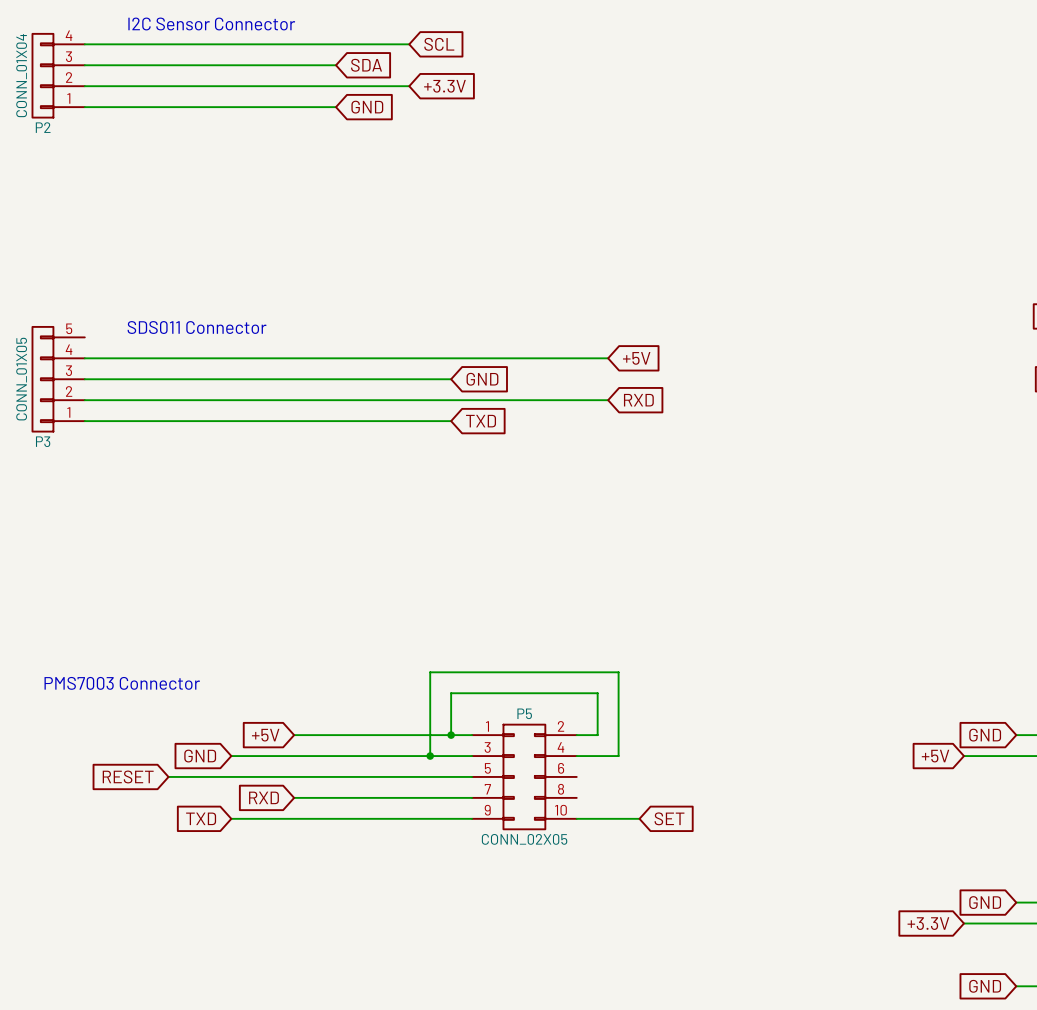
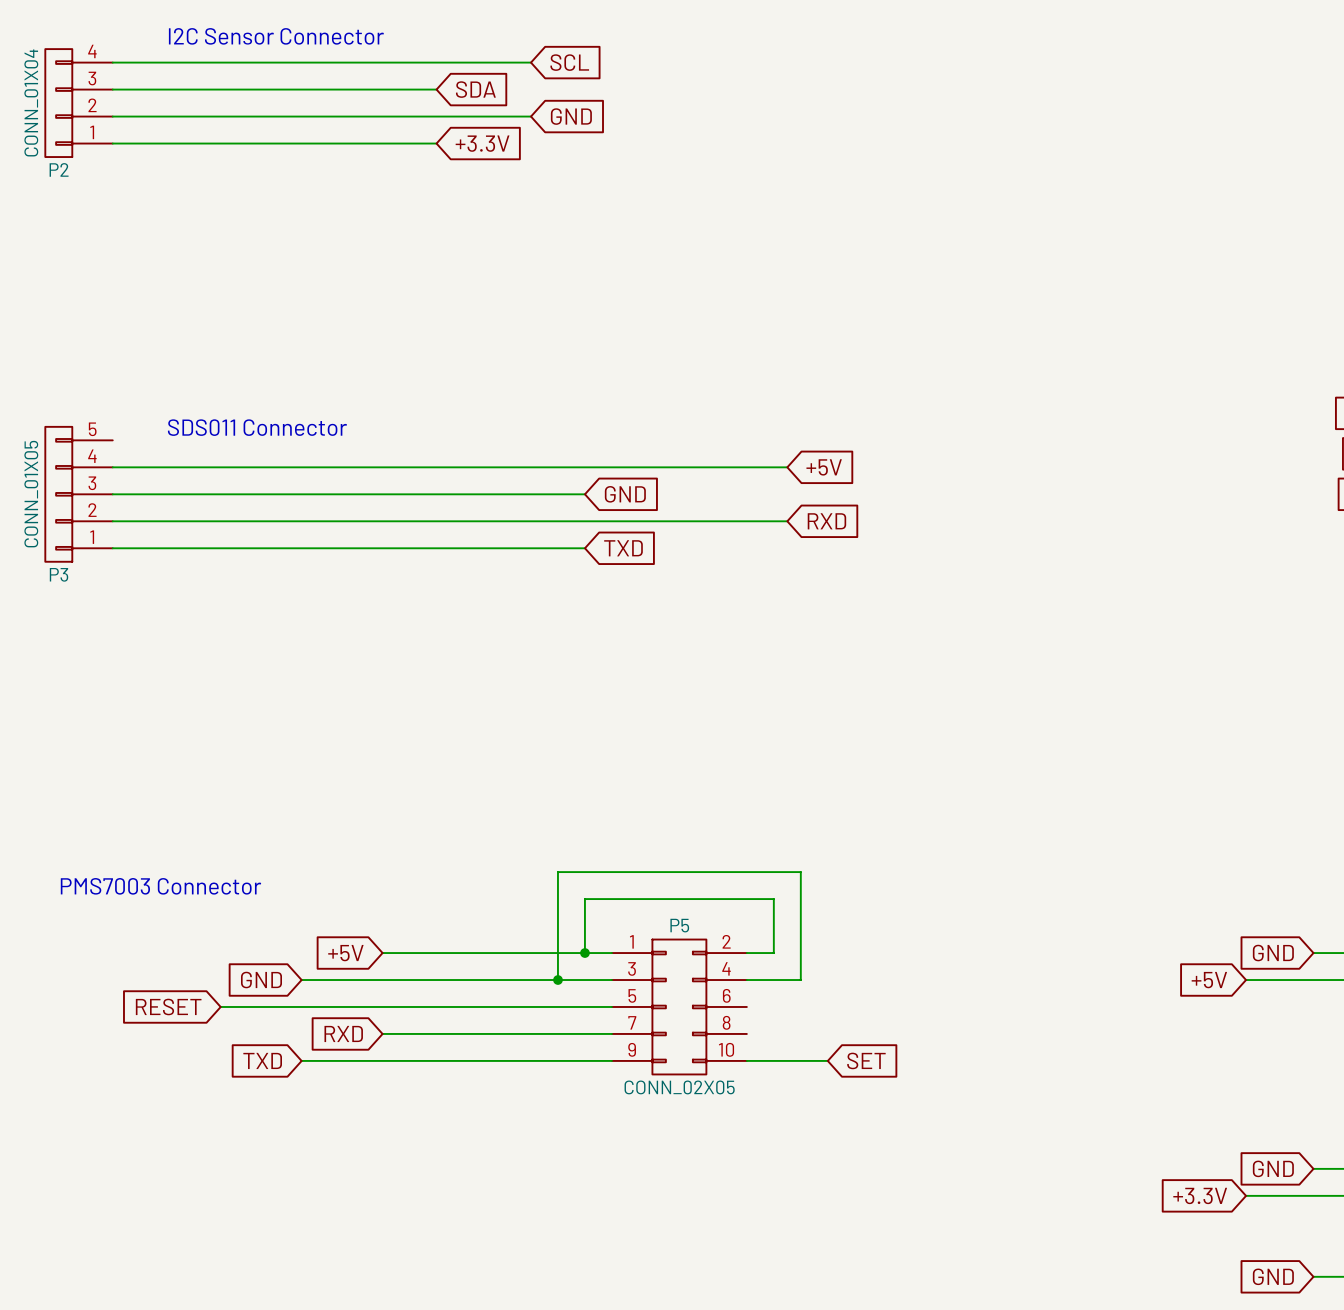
global label: +3.3V (444, 86) -> GND (571, 116)
global label: GND (367, 107) -> +3.3V (482, 143)

